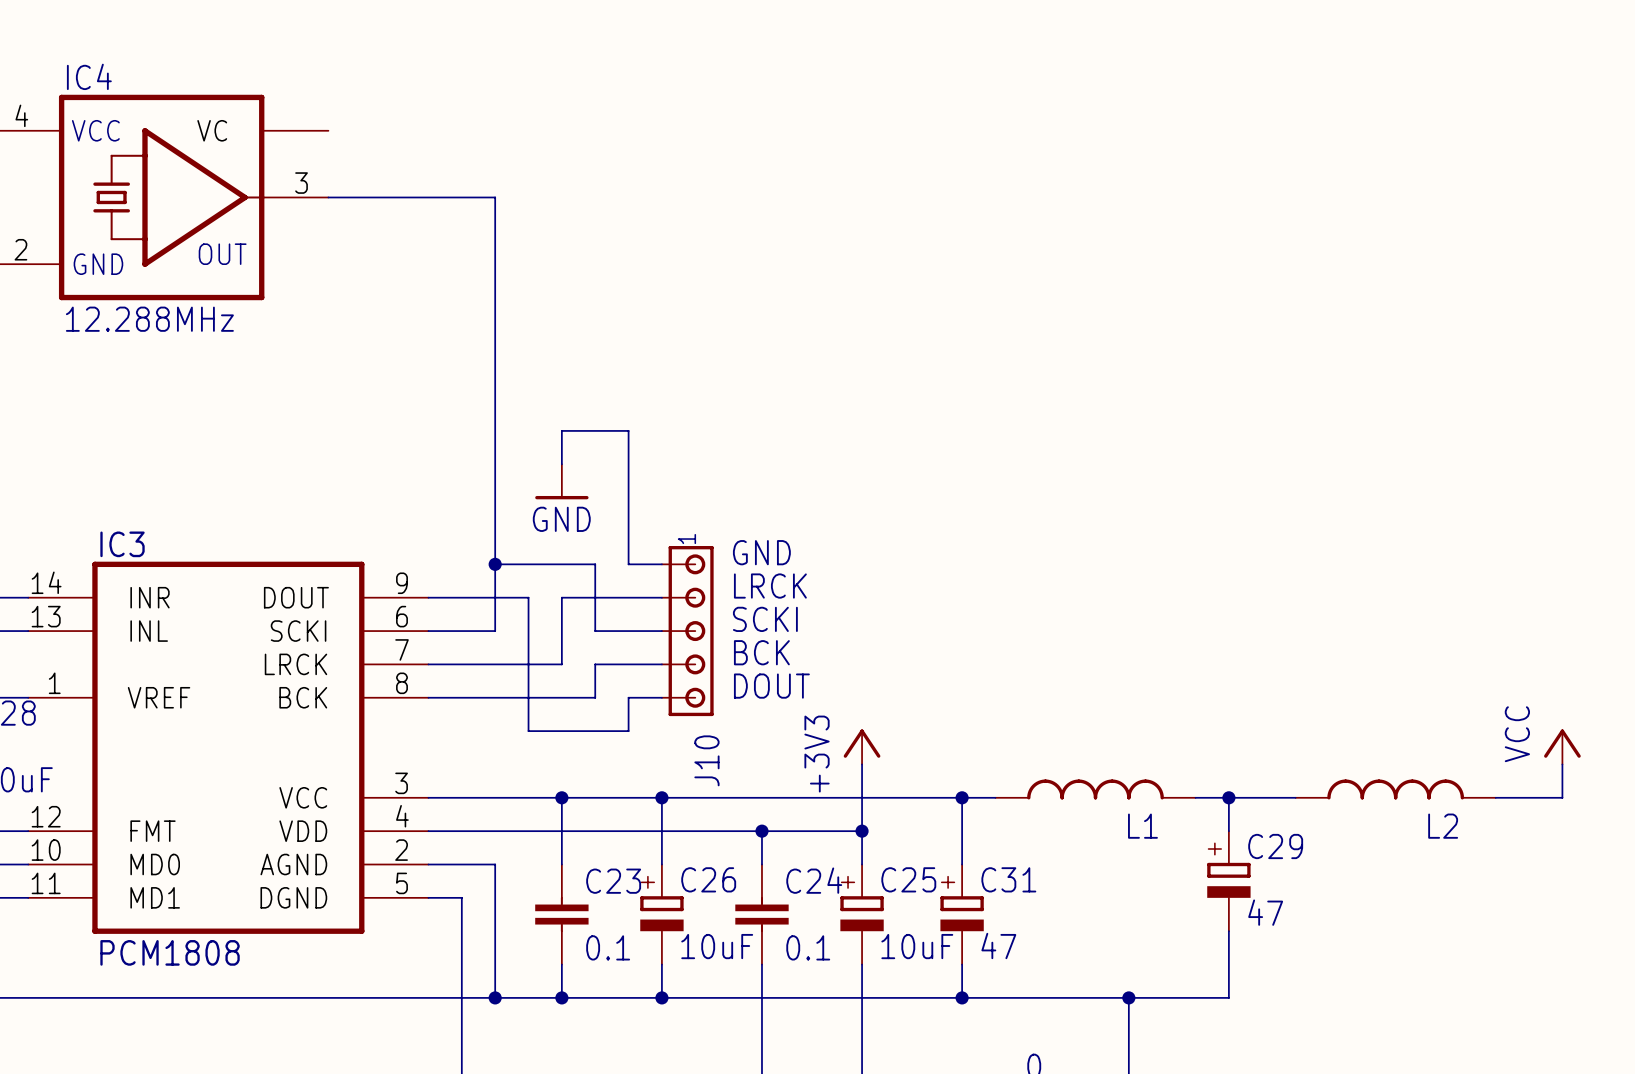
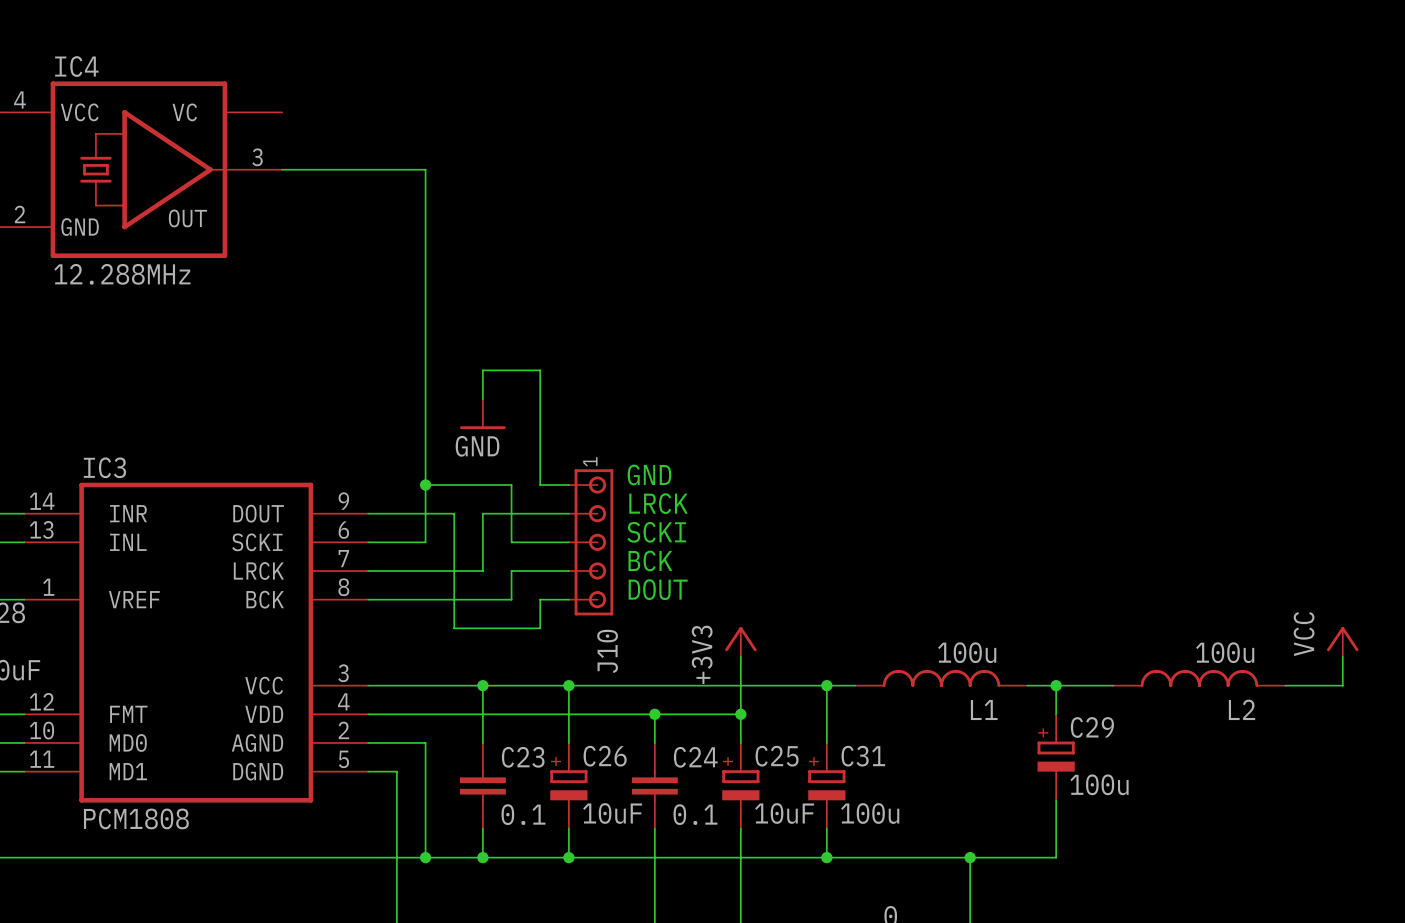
L1 value: none -> 100u (967, 652)
L2 value: none -> 100u (1225, 652)
C29 value: 47 (1265, 912) -> 100u (1099, 784)
C31 value: 47 (998, 945) -> 100u (870, 813)

